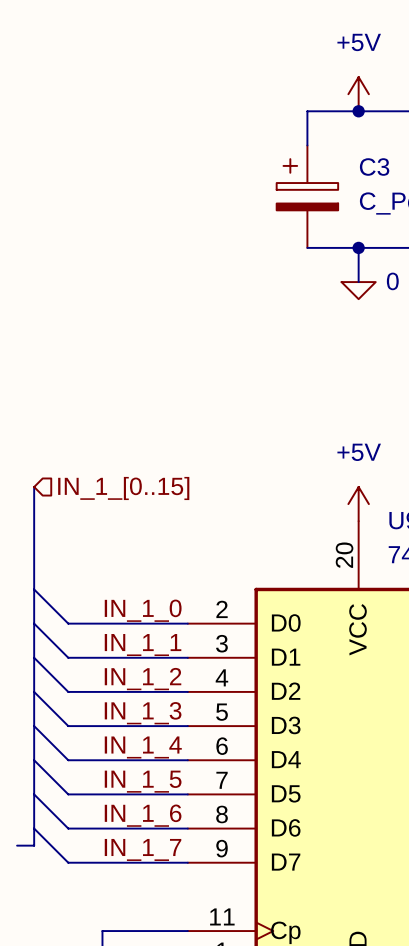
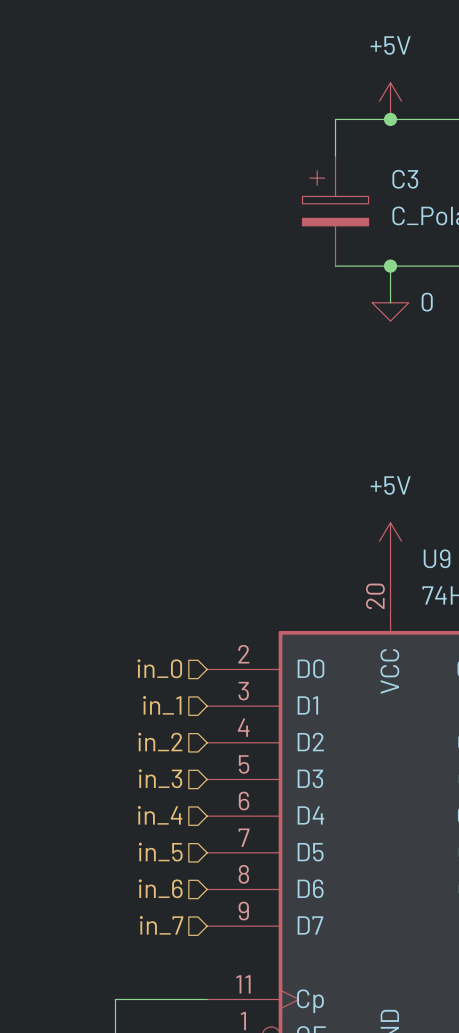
bus: (34, 487) (34, 845) (17, 845) -> none
hierarchical label: IN_1_[0..15] (123, 488) -> none
wire: (34, 589) (68, 623) (187, 623) -> none
label: IN_1_0 (143, 610) -> none
wire: (34, 623) (68, 657) (187, 657) -> none
hierarchical label: none -> in_0 (159, 668)
label: IN_1_1 (143, 645) -> none
wire: (34, 657) (68, 691) (187, 691) -> none
hierarchical label: none -> in_1 (162, 705)
label: IN_1_2 (143, 679) -> none
wire: (34, 691) (68, 726) (187, 726) -> none
hierarchical label: none -> in_2 (160, 741)
label: IN_1_3 (143, 713) -> none
wire: (34, 726) (68, 760) (187, 760) -> none
hierarchical label: none -> in_3 (160, 778)
label: IN_1_4 (143, 747) -> none
wire: (34, 760) (68, 794) (187, 794) -> none
hierarchical label: none -> in_4 (160, 815)
label: IN_1_5 (143, 781) -> none
wire: (34, 794) (68, 828) (187, 828) -> none
hierarchical label: none -> in_5 (160, 852)
label: IN_1_6 (143, 815) -> none
wire: (34, 828) (68, 862) (187, 862) -> none
hierarchical label: none -> in_6 (160, 888)
label: IN_1_7 (143, 849) -> none
hierarchical label: none -> in_7 (161, 925)

